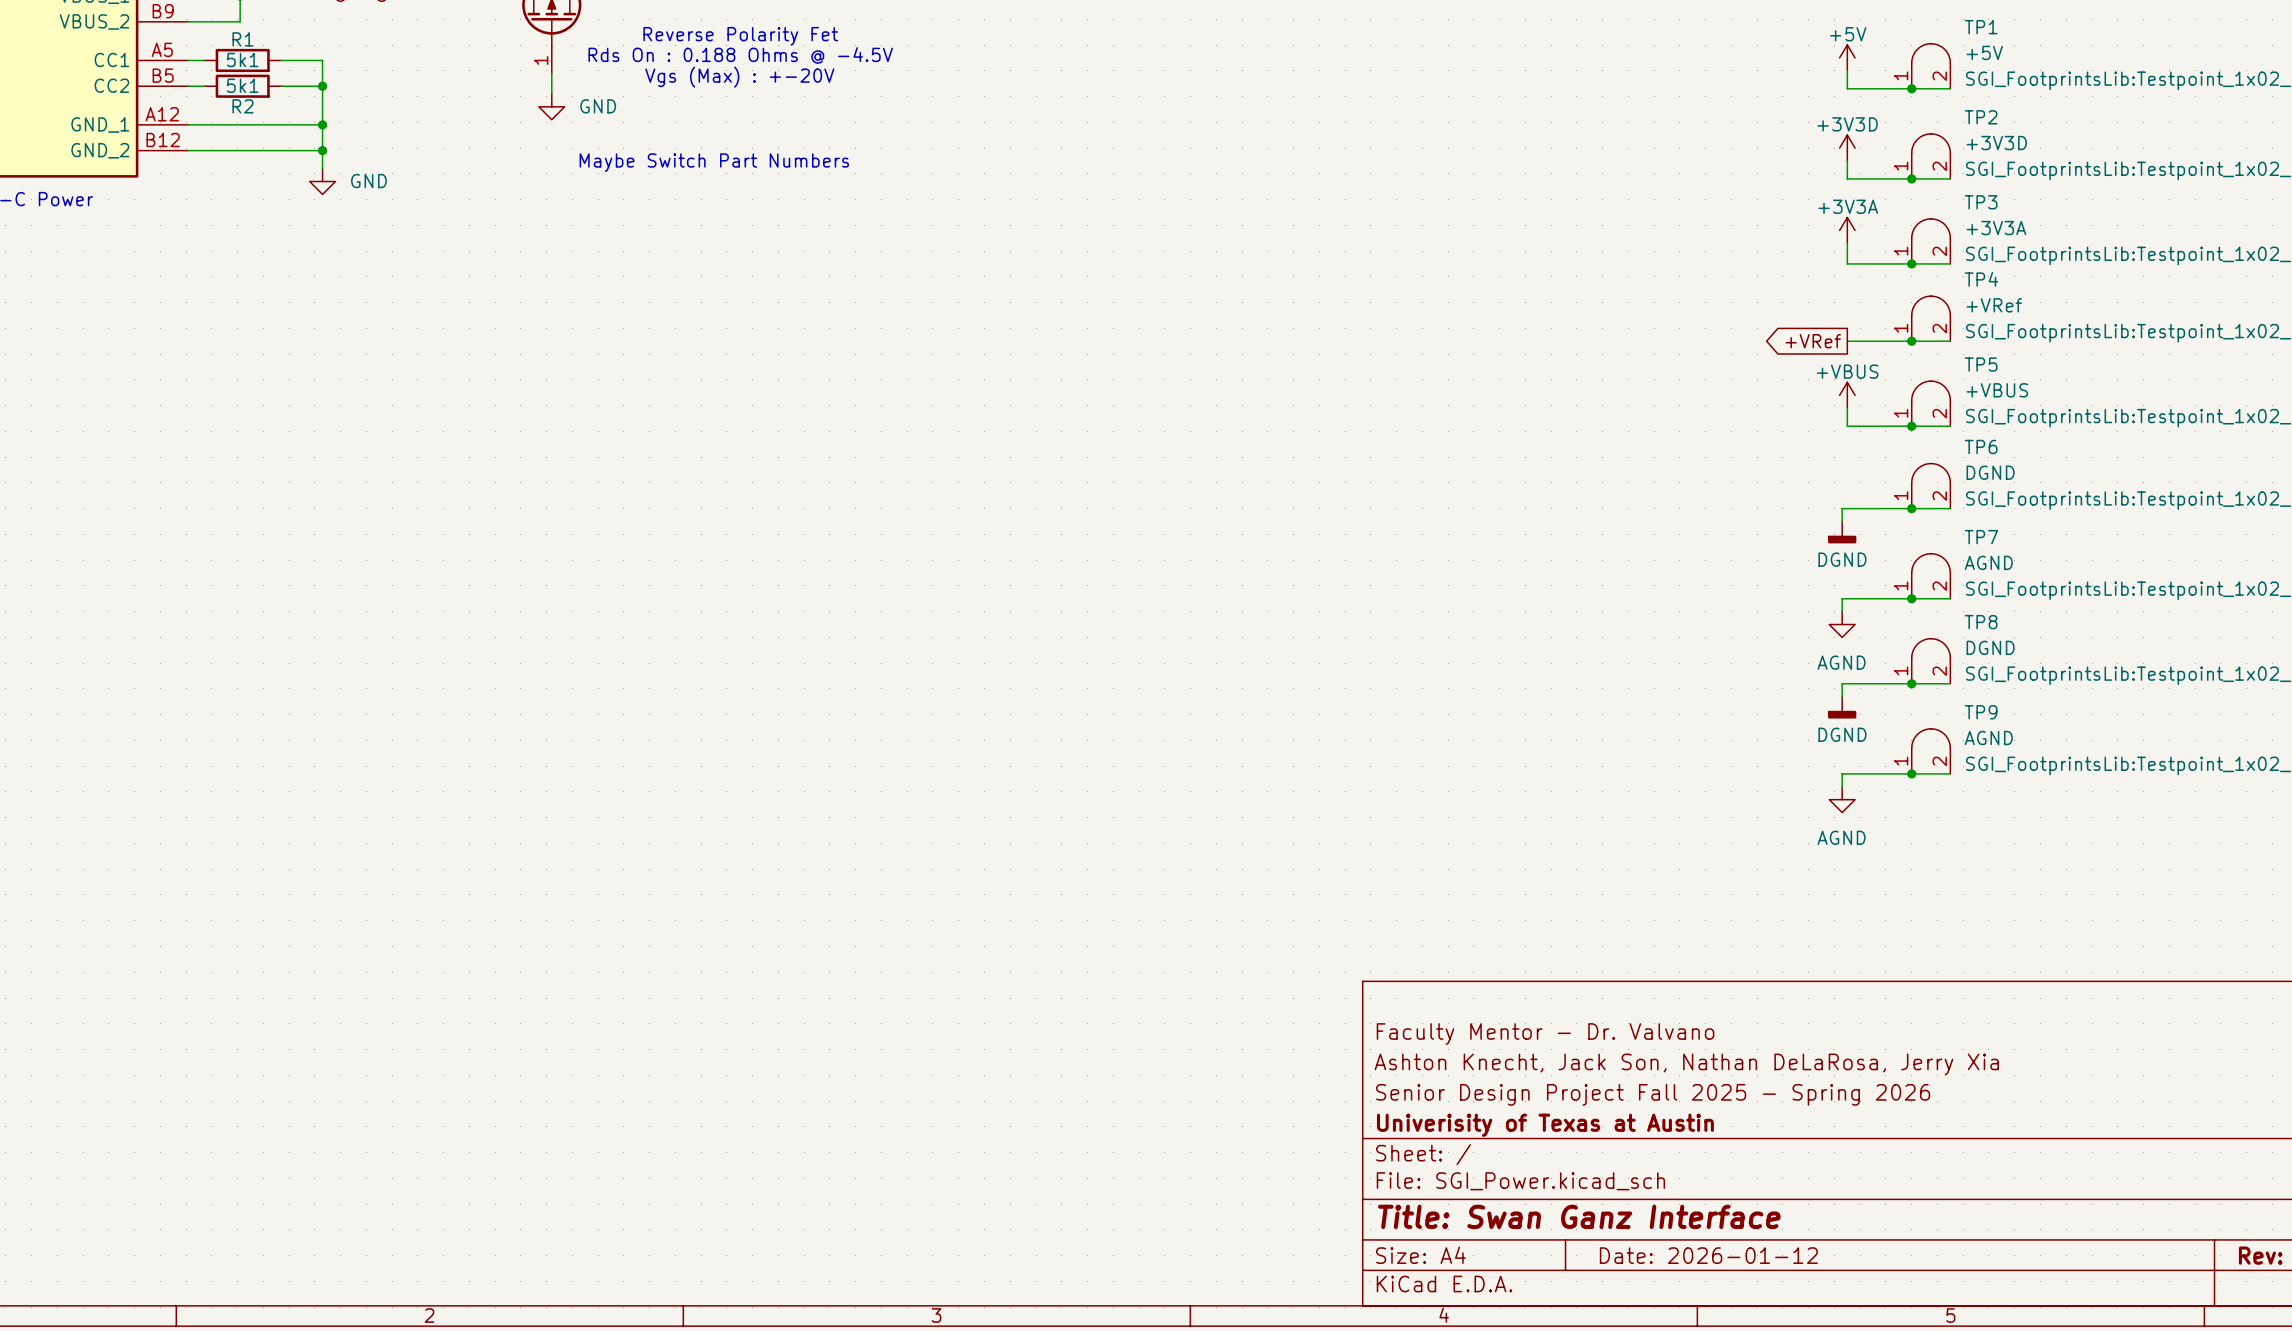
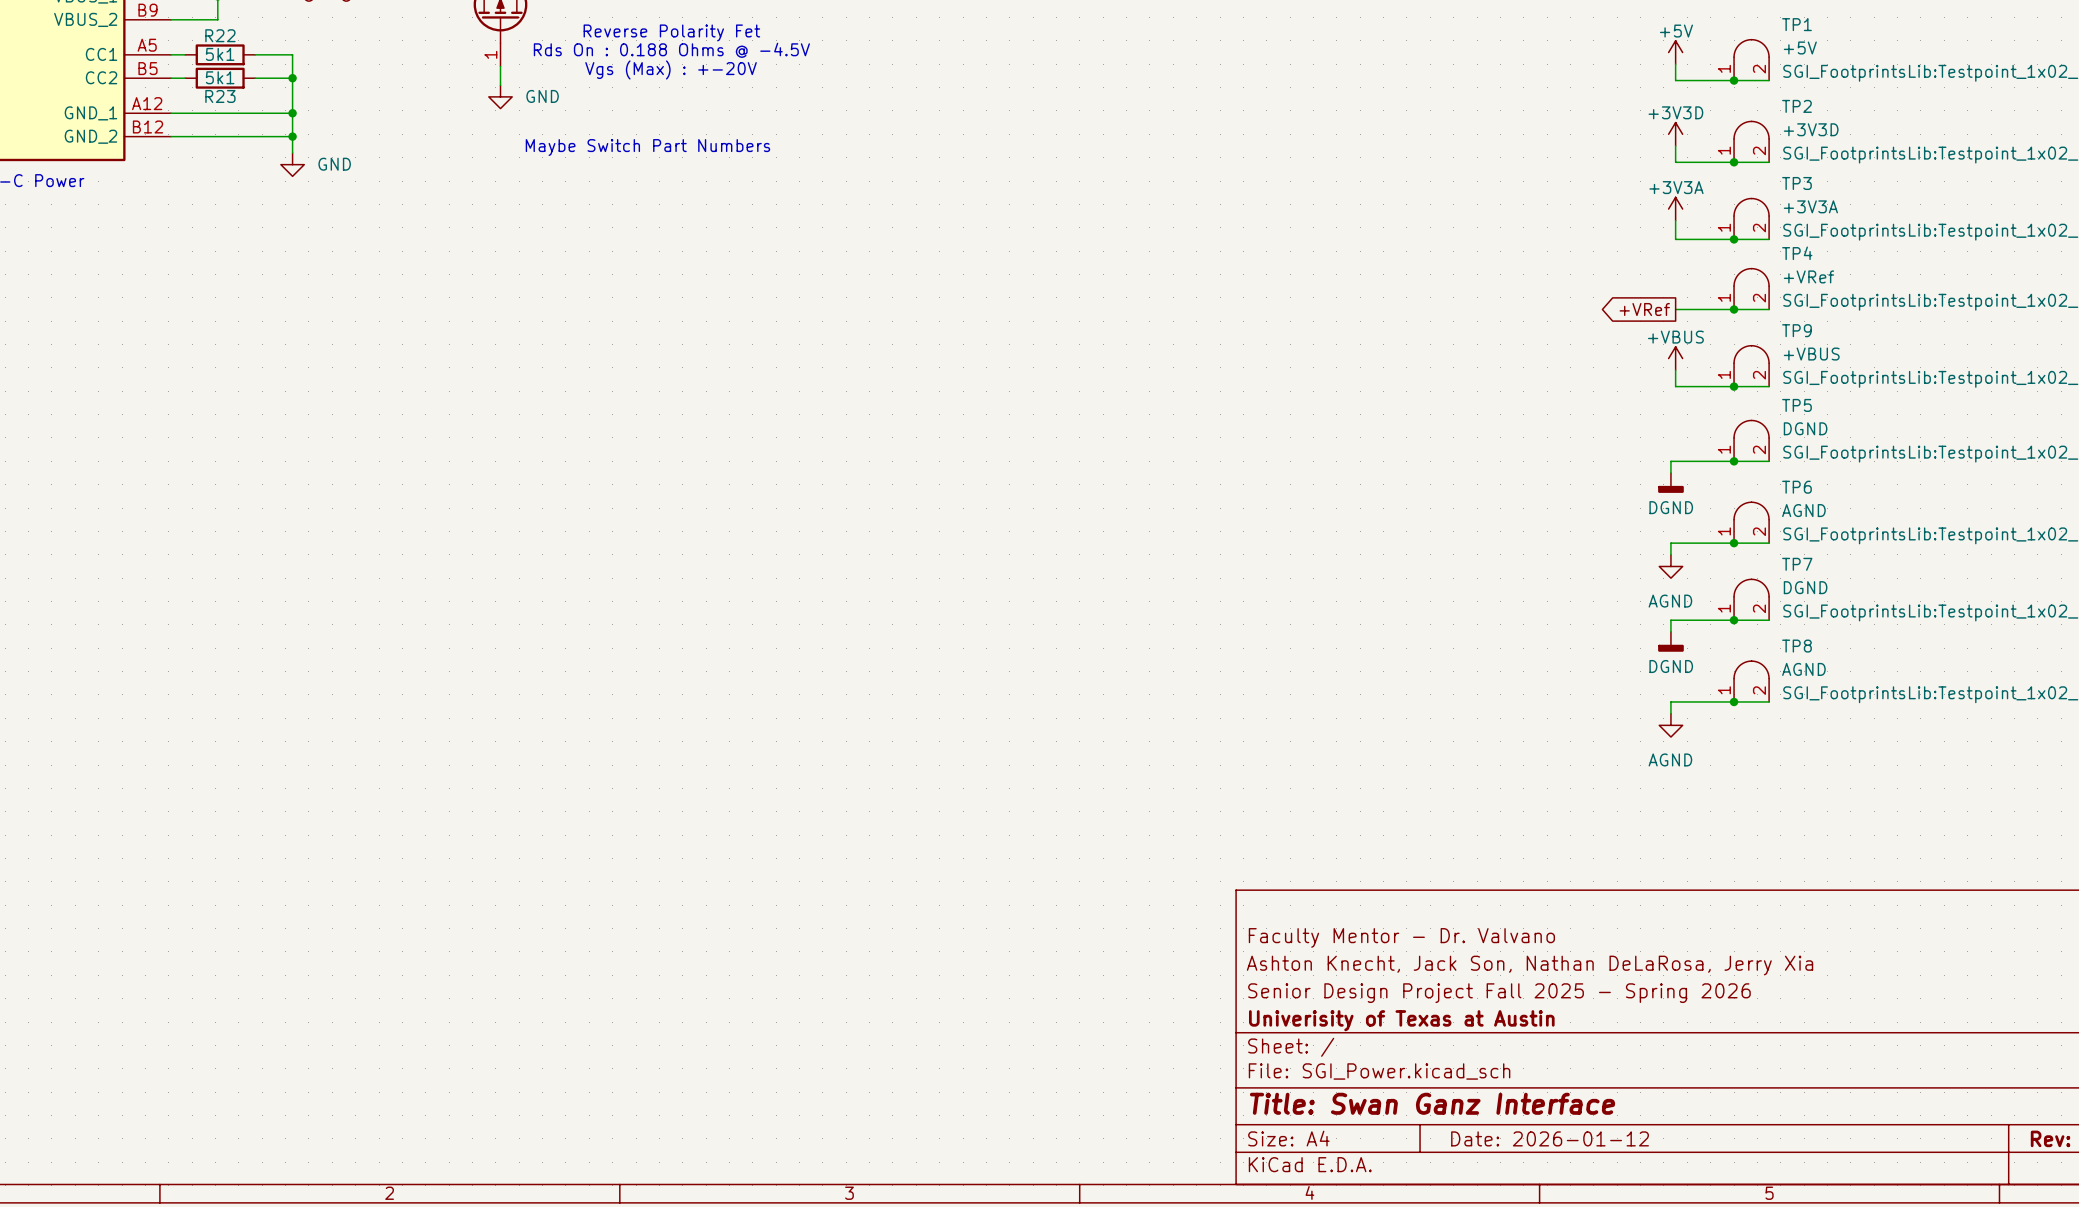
R1 name: R1 (243, 39) -> R22 (220, 35)
R2 name: R2 (243, 106) -> R23 (220, 96)
TP5 name: TP5 (1981, 364) -> TP9 (1796, 330)
TP6 name: TP6 (1981, 446) -> TP5 (1796, 405)
TP7 name: TP7 (1981, 537) -> TP6 (1796, 487)
TP8 name: TP8 (1981, 622) -> TP7 (1797, 564)
TP9 name: TP9 (1981, 712) -> TP8 (1796, 646)

